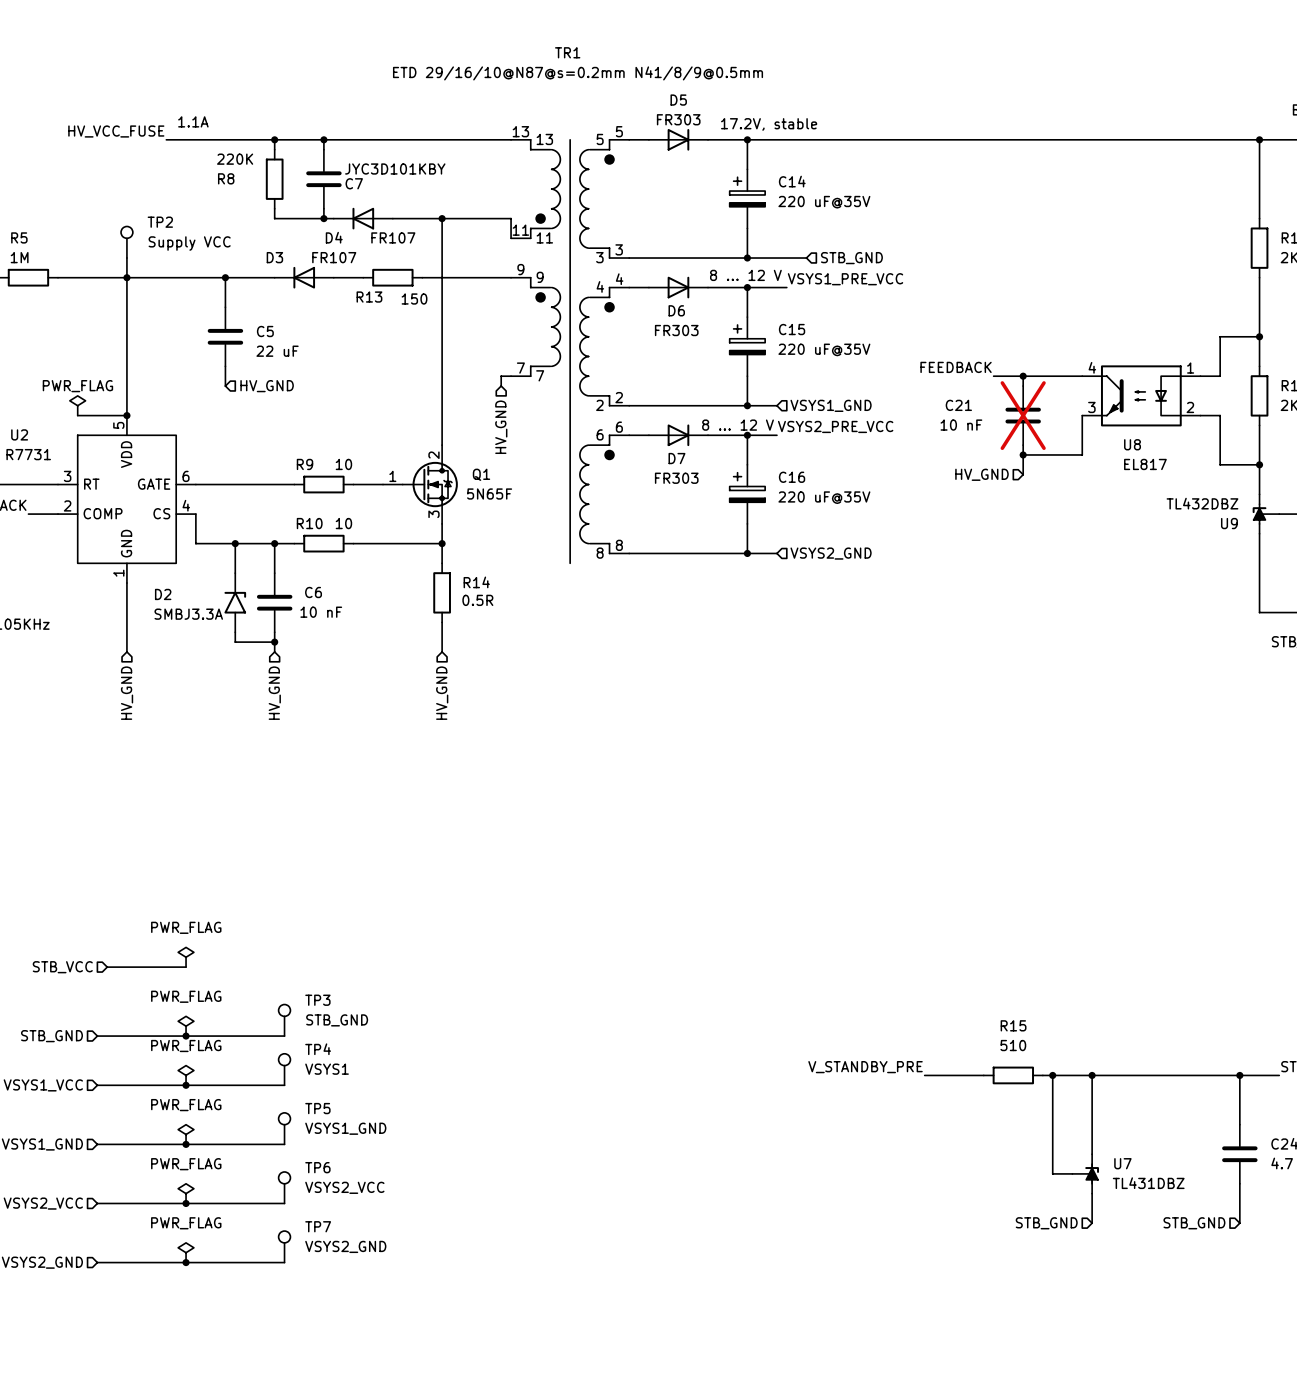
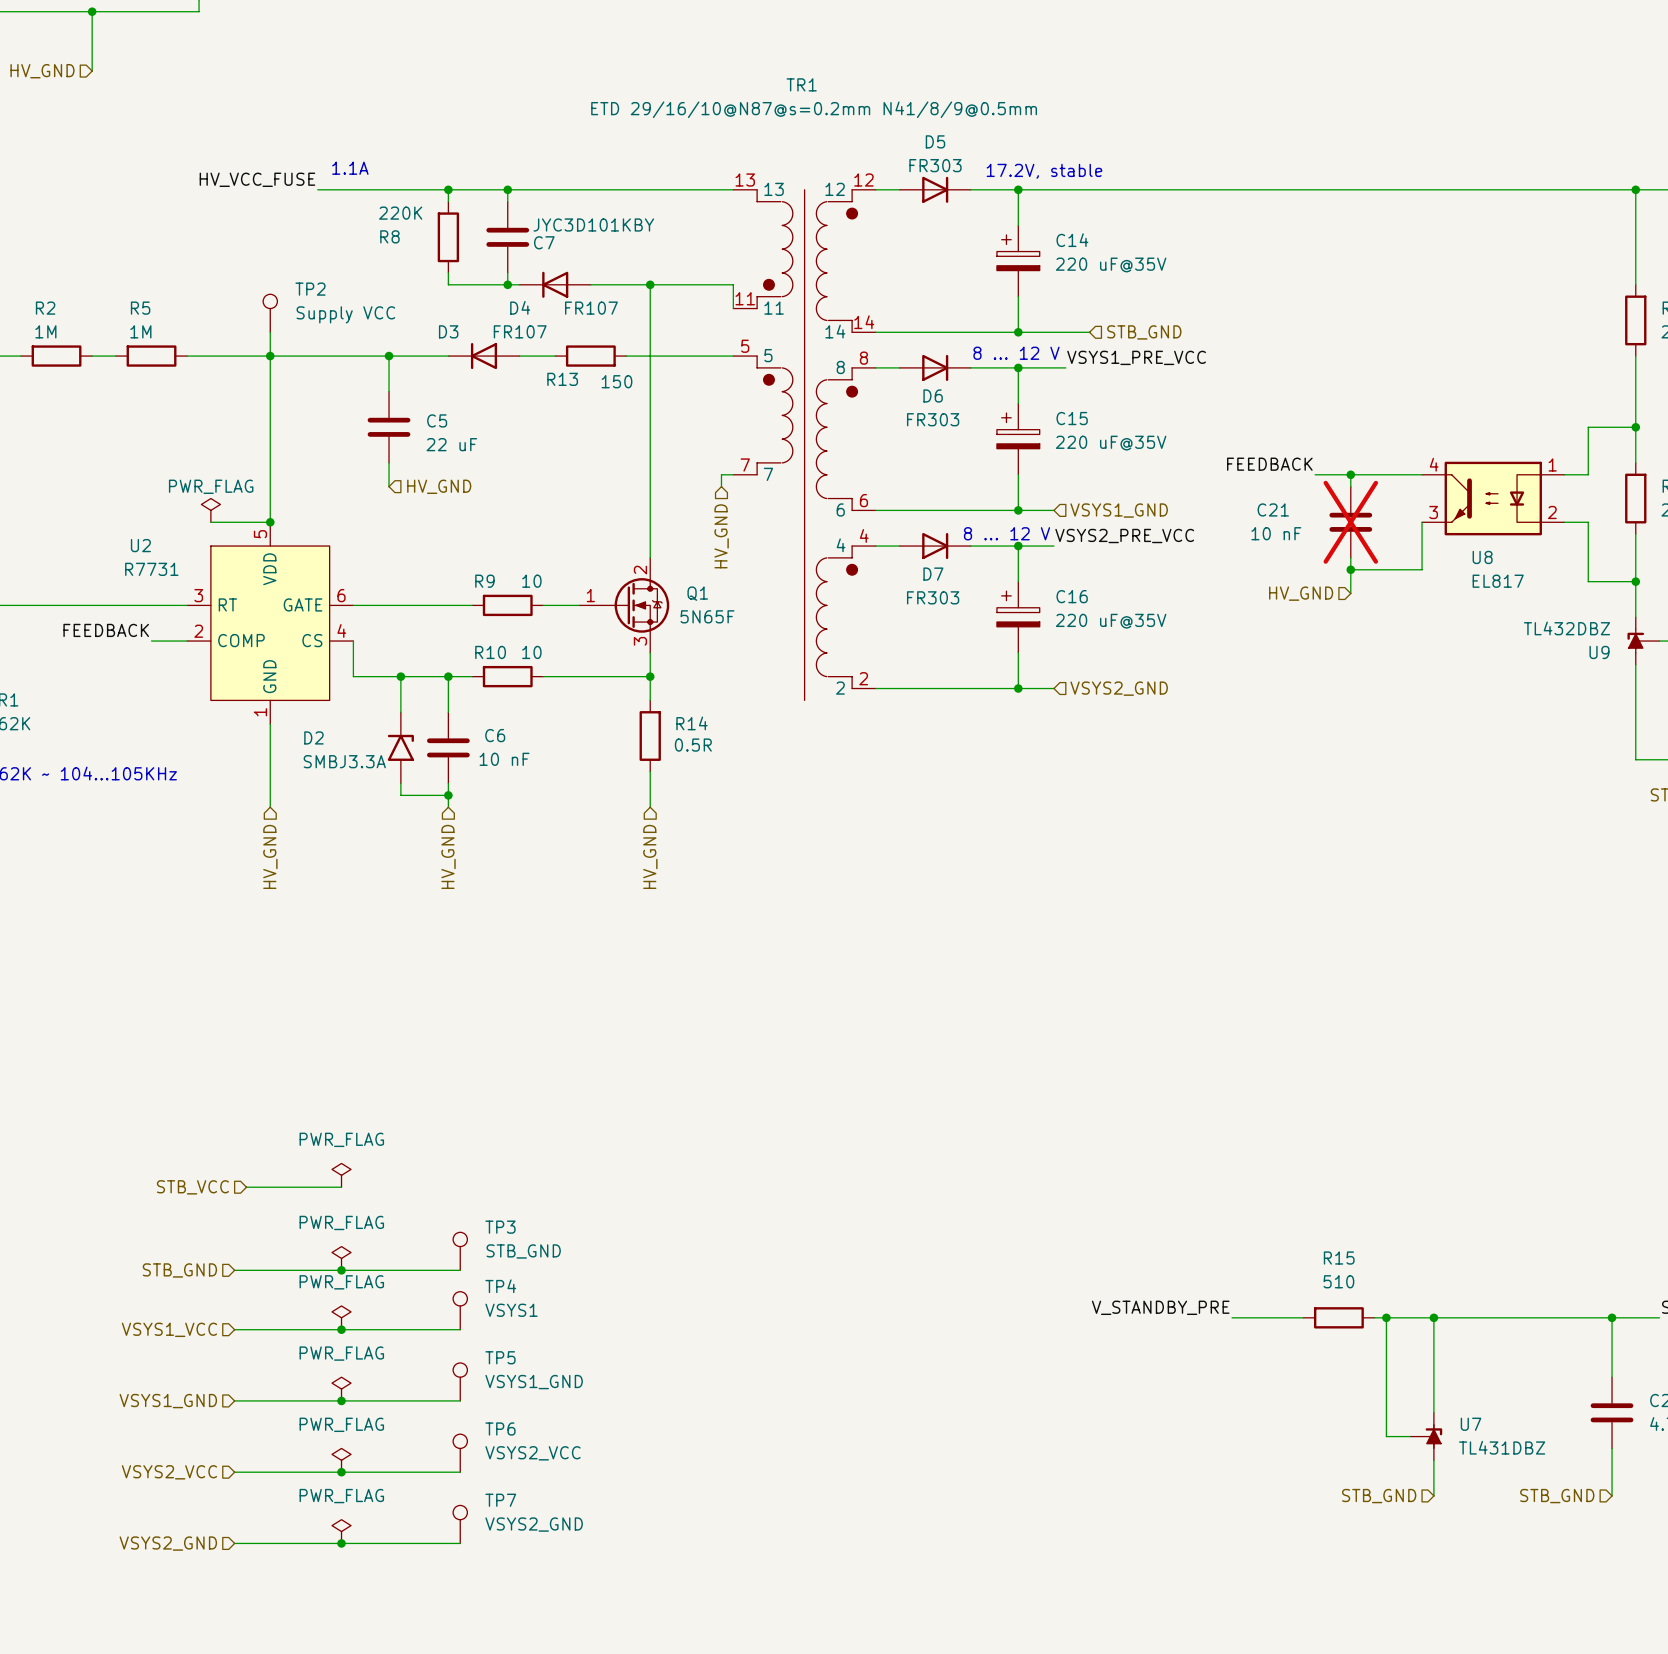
TR1 symbol: [511, 139, 630, 564] -> [733, 189, 876, 701]

